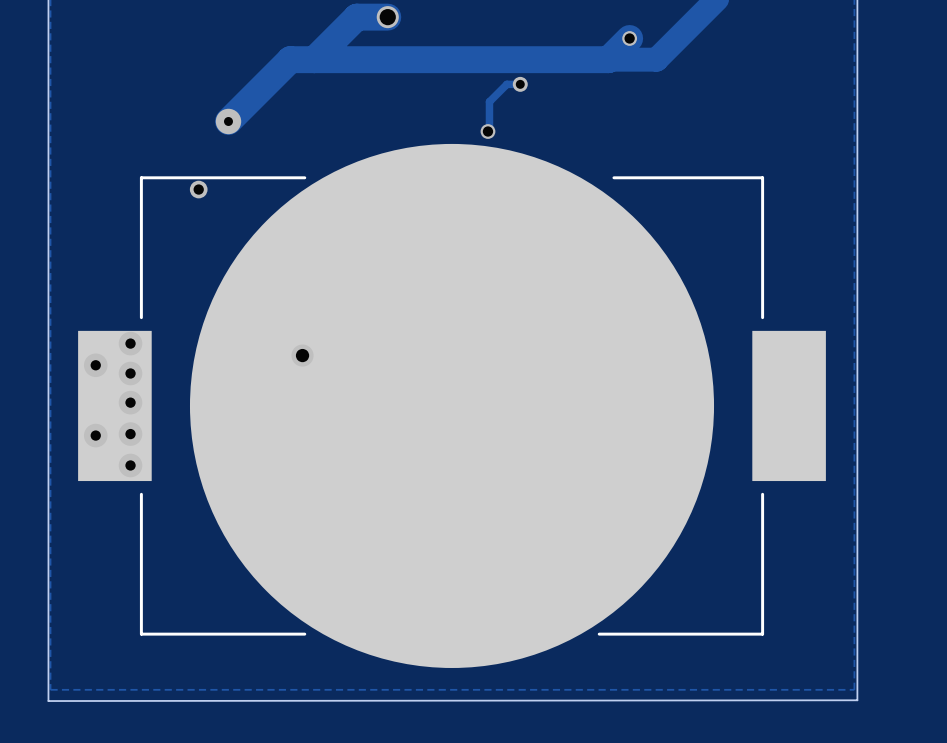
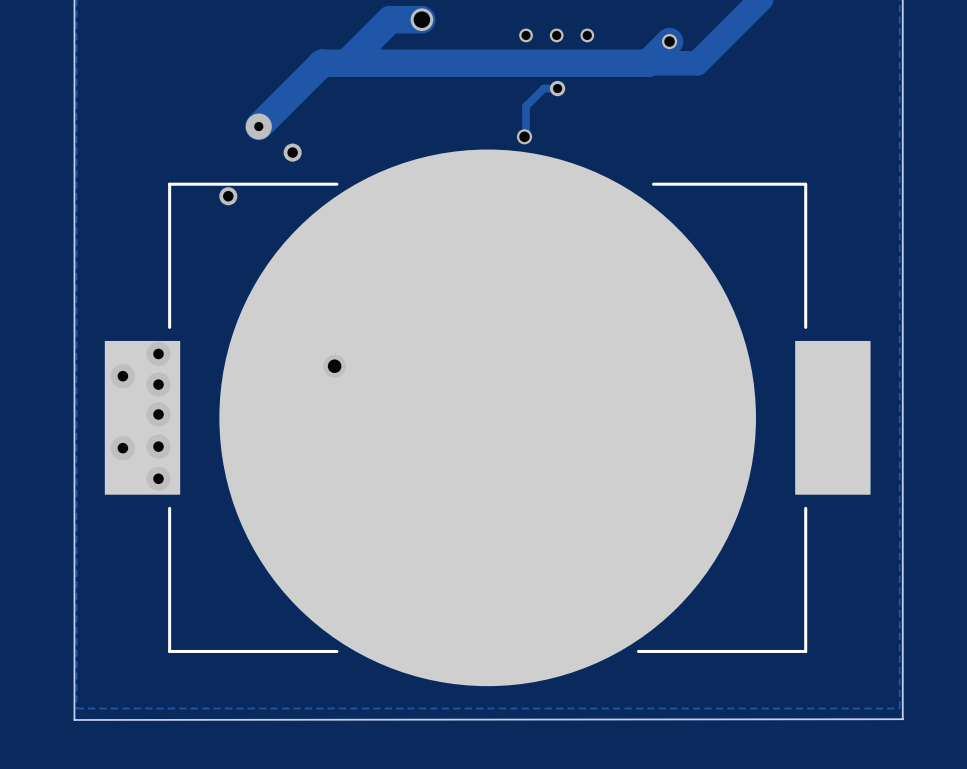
via: none -> (526, 35)
via: none -> (556, 35)
via: none -> (587, 35)
via: none -> (292, 152)

